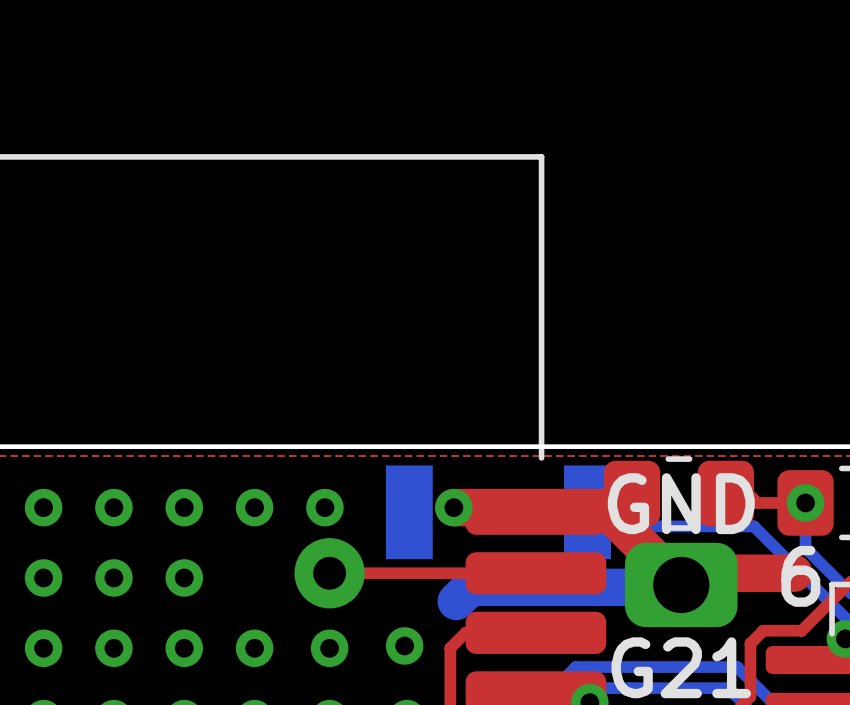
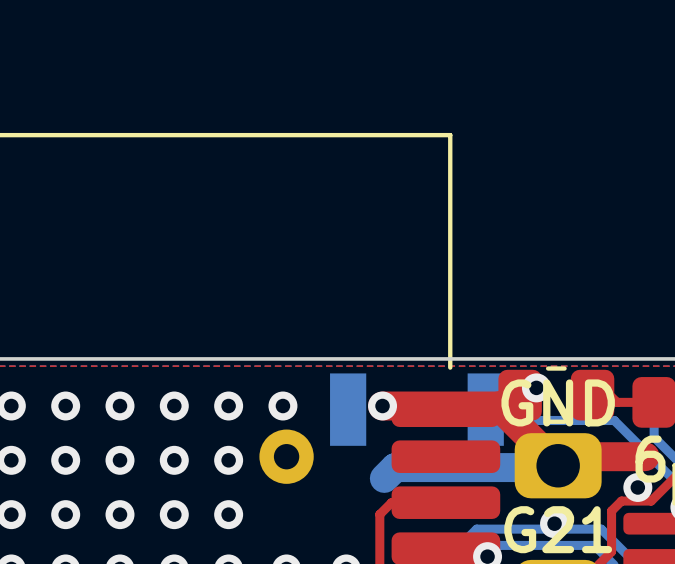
via: none -> (536, 387)
via: (805, 502) -> none
top track: (329, 573) (535, 573) -> none
via: none -> (228, 460)
via: none -> (637, 487)
via: (404, 645) -> none
via: (329, 648) -> none
via: none -> (554, 523)

